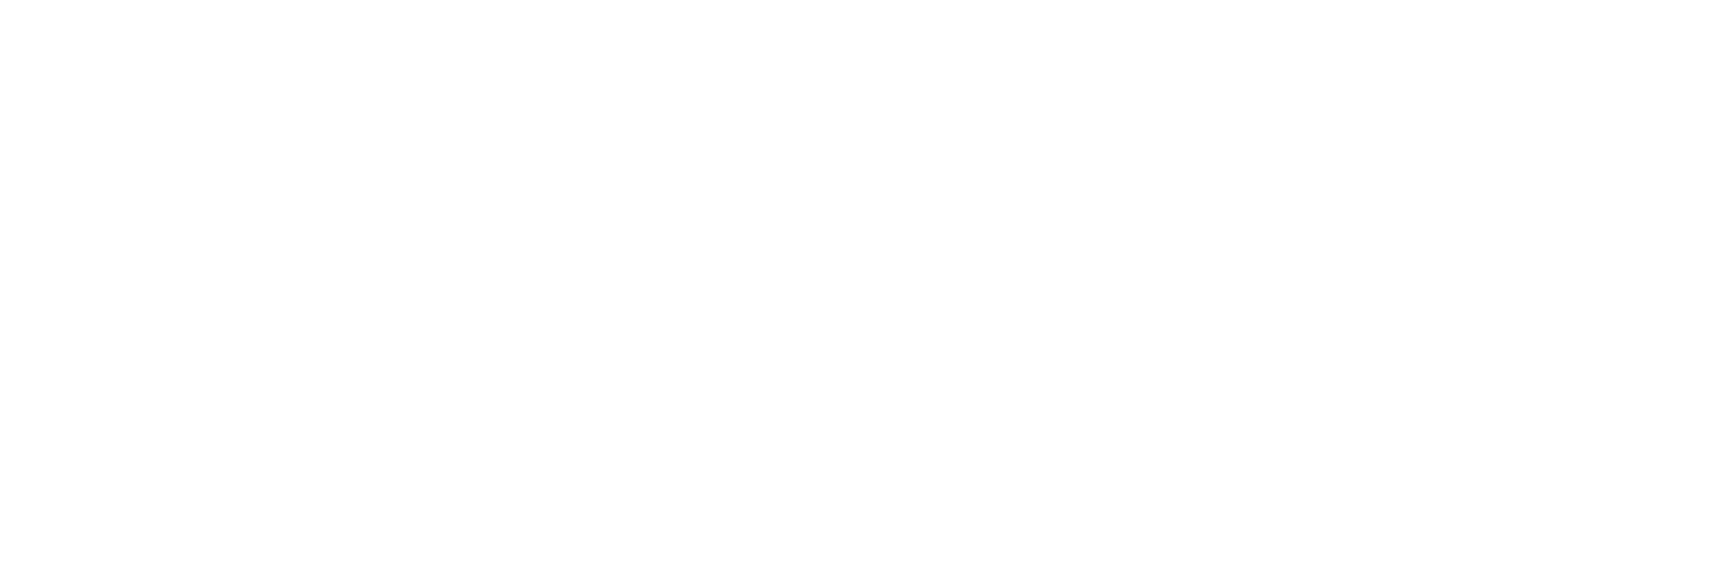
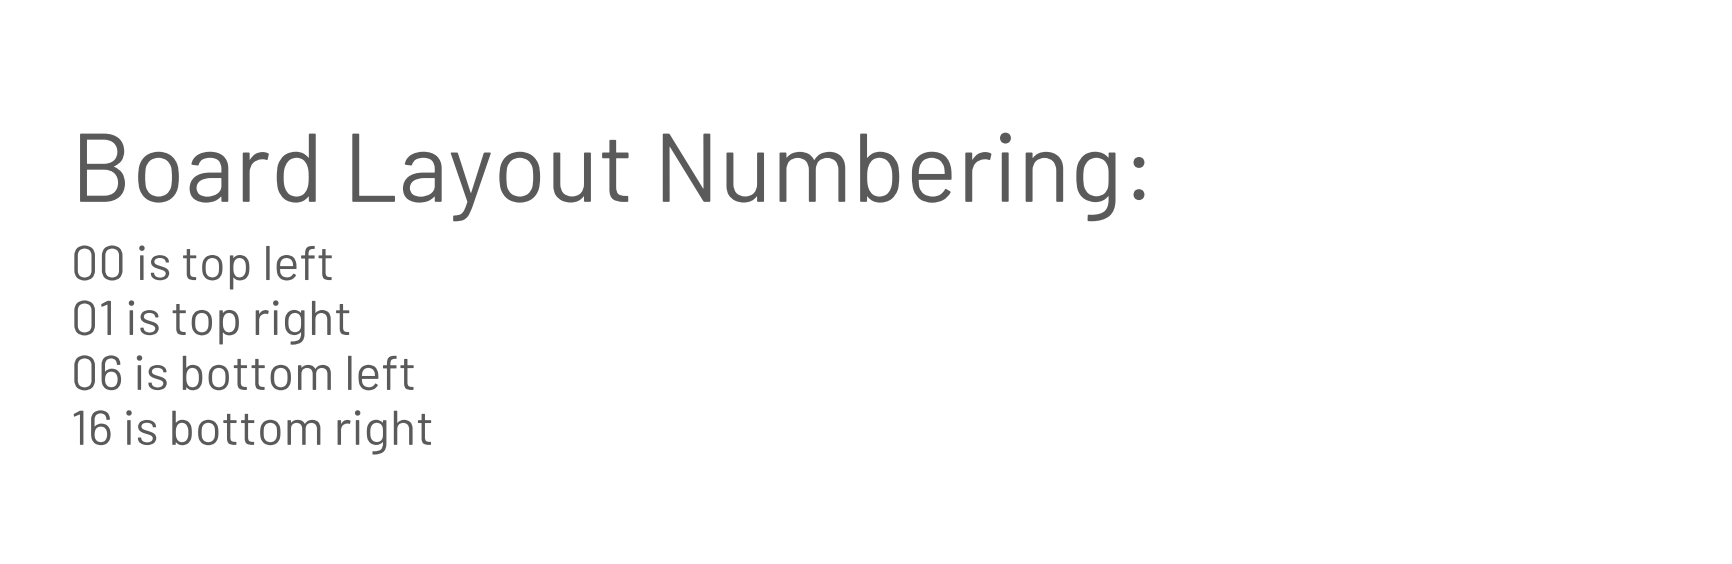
text: none -> Board Layout Numbering: (612, 176)
text: none -> 00 is top left (203, 267)
text: none -> 01 is top right (211, 322)
text: none -> 06 is bottom left (243, 372)
text: none -> 16 is bottom right (252, 432)

